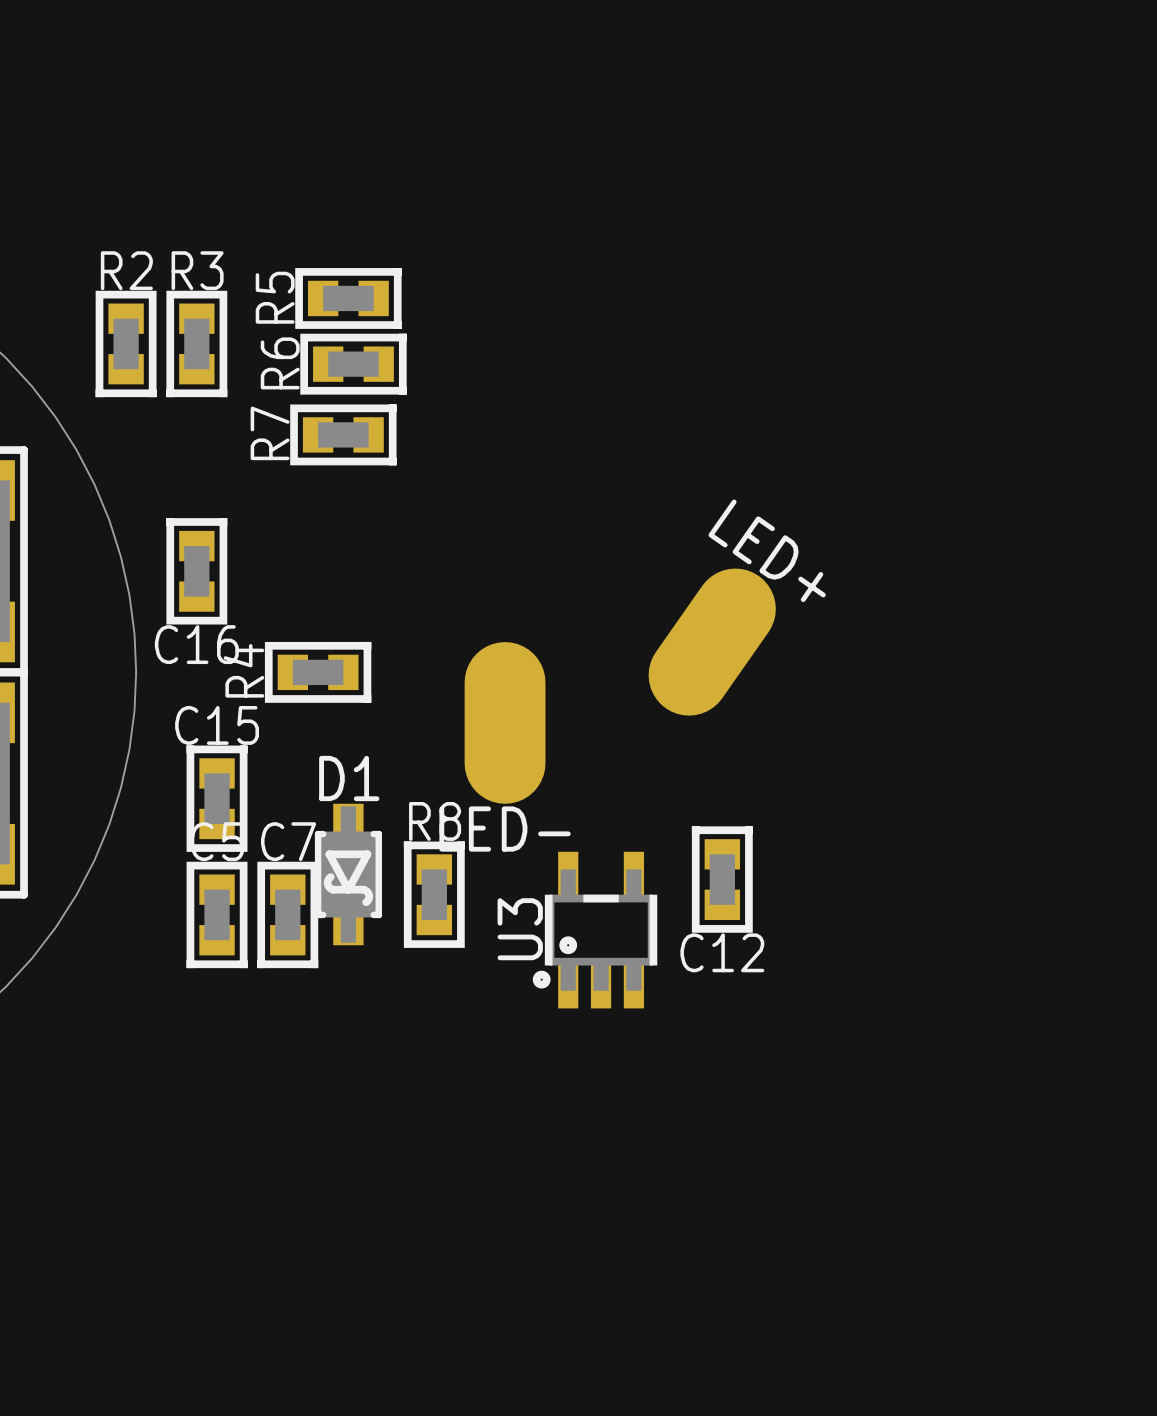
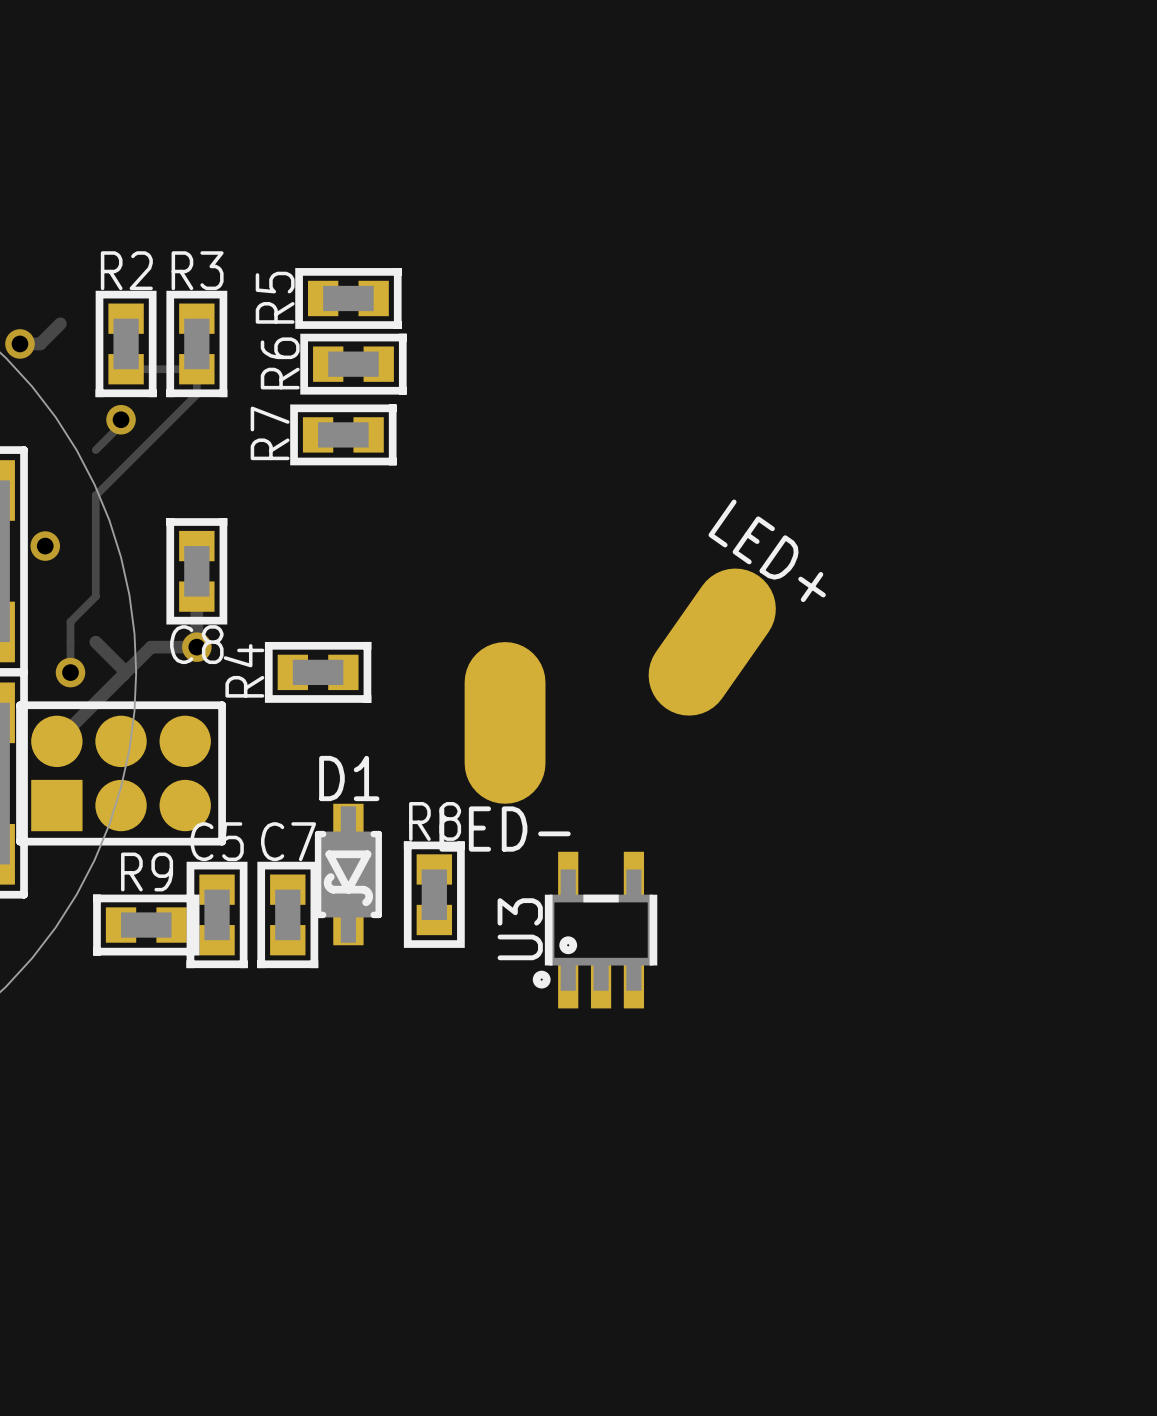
track: none -> (60, 323) (40, 343) (19, 343)
via: none -> (19, 343)
track: none -> (126, 369) (196, 369) (196, 394) (95, 495) (95, 596) (70, 621) (70, 672)
track: none -> (121, 419) (121, 424) (95, 450)
via: none -> (121, 419)
via: none -> (45, 546)
track: none -> (196, 596) (196, 647) (151, 647) (56, 741)
track: none -> (95, 642) (123, 669) (123, 674)
C16 name: C16 (196, 644) -> C8 (196, 644)
via: none -> (196, 647)
via: none -> (70, 672)
part: none -> (121, 773)
C15: (217, 798) -> none
C12: (722, 879) -> none
R9: none -> (146, 925)

